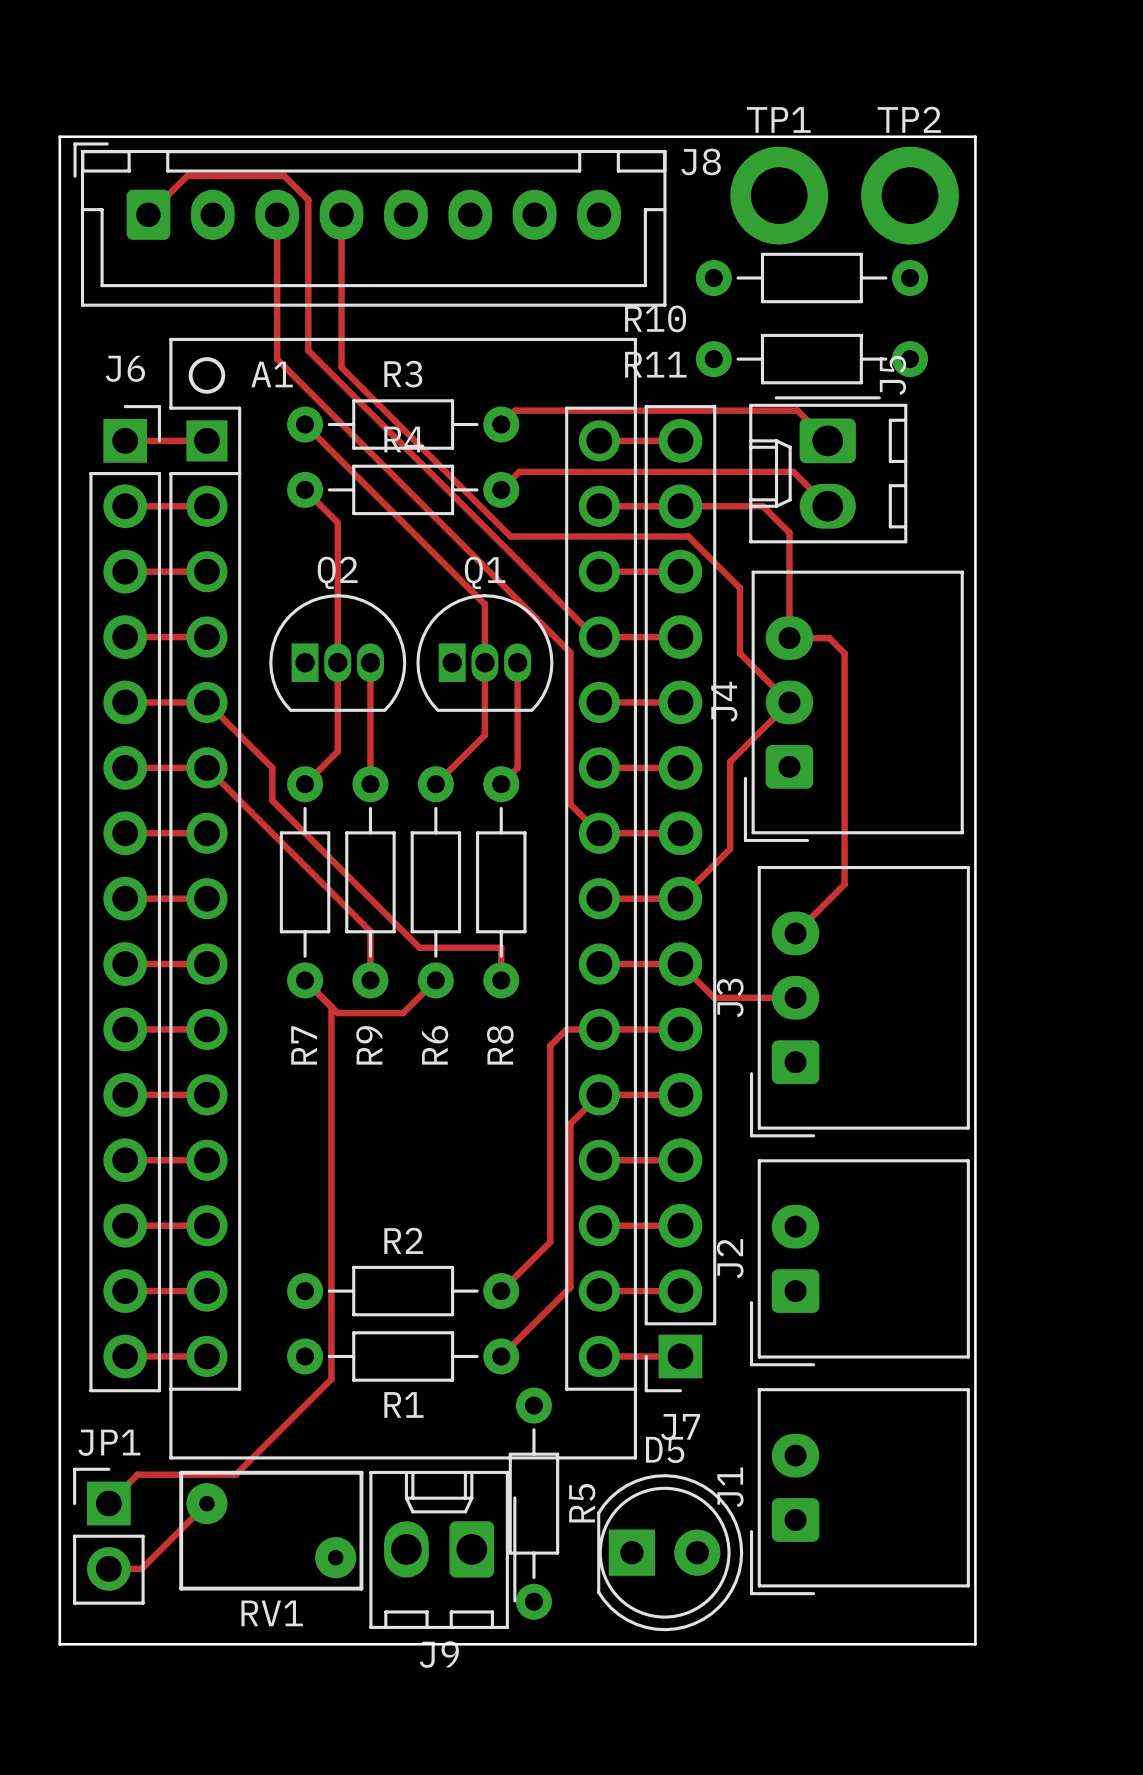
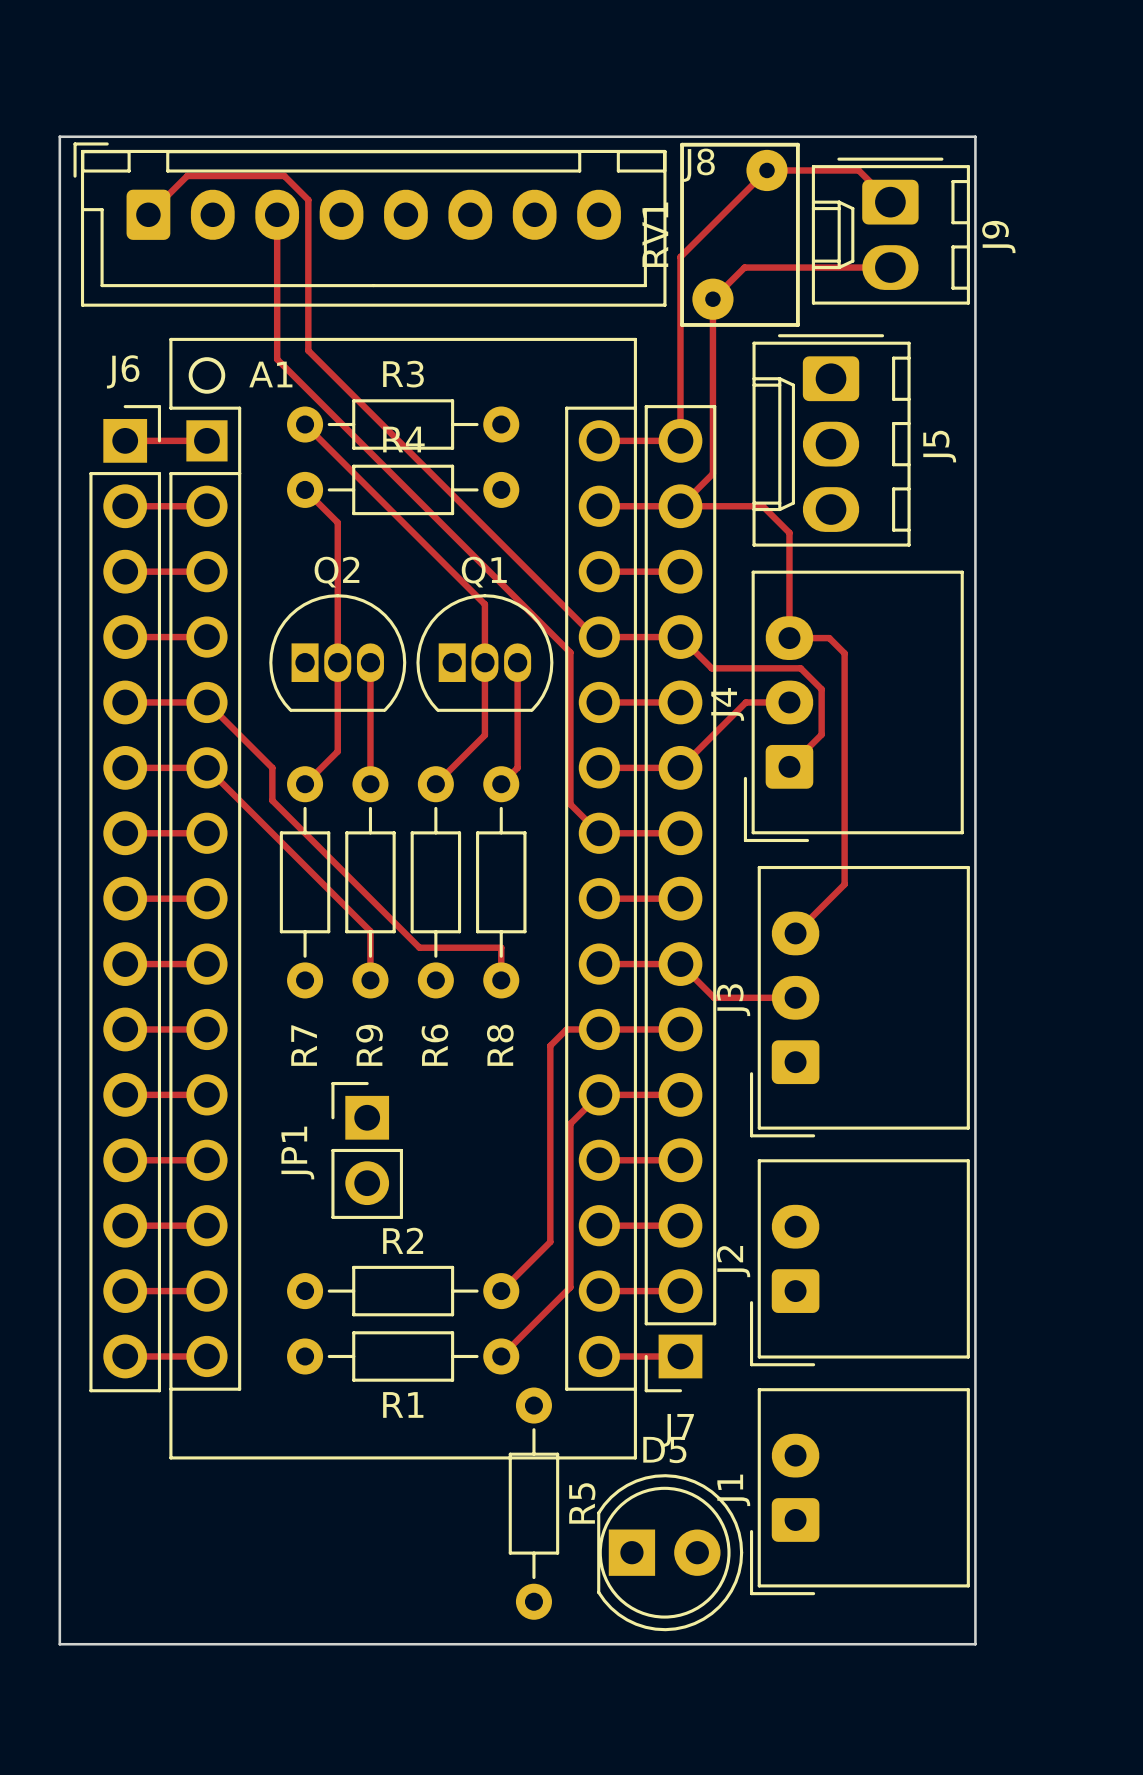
TP1: (779, 195) -> none
TP2: (910, 195) -> none
track: none -> (890, 202) (858, 170) (767, 170) (680, 257) (680, 440)
track: (341, 214) (341, 367) (510, 536) (688, 536) (739, 588) (739, 653) (789, 702) -> none
track: none -> (890, 267) (744, 267) (712, 299) (712, 473) (680, 506)
R10: (811, 278) -> none
R11: (811, 359) -> none
J5 name position: J5 (892, 375) -> J5 (939, 446)
J5 footprint: [749, 396, 908, 544] -> [752, 334, 911, 547]
track: (501, 424) (515, 410) (797, 410) (827, 440) -> none
track: (501, 489) (519, 471) (793, 471) (827, 506) -> none
track: none -> (680, 637) (711, 668) (800, 668) (821, 689) (821, 734) (789, 766)
track: (789, 702) (730, 761) (730, 848) (680, 898) -> (789, 702) (745, 702) (680, 767)
track: (305, 980) (337, 1013) (403, 1013) (435, 980) -> none
track: (331, 1006) (331, 1379) (235, 1474) (137, 1474) (108, 1503) -> none
JP1 name rotation: 0° (109, 1442) -> 90° counterclockwise (297, 1153)
JP1 name position: JP1 (109, 1442) -> JP1 (297, 1153)
track: (206, 1503) (141, 1568) (108, 1568) -> none
RV1 rotation: 0° (271, 1530) -> 90° clockwise (739, 234)
RV1 position: (271, 1530) -> (739, 234)
JP1 position: (108, 1536) -> (367, 1150)
J9 rotation: 0° (442, 1549) -> 90° counterclockwise (890, 231)
J9 position: (442, 1549) -> (890, 231)

